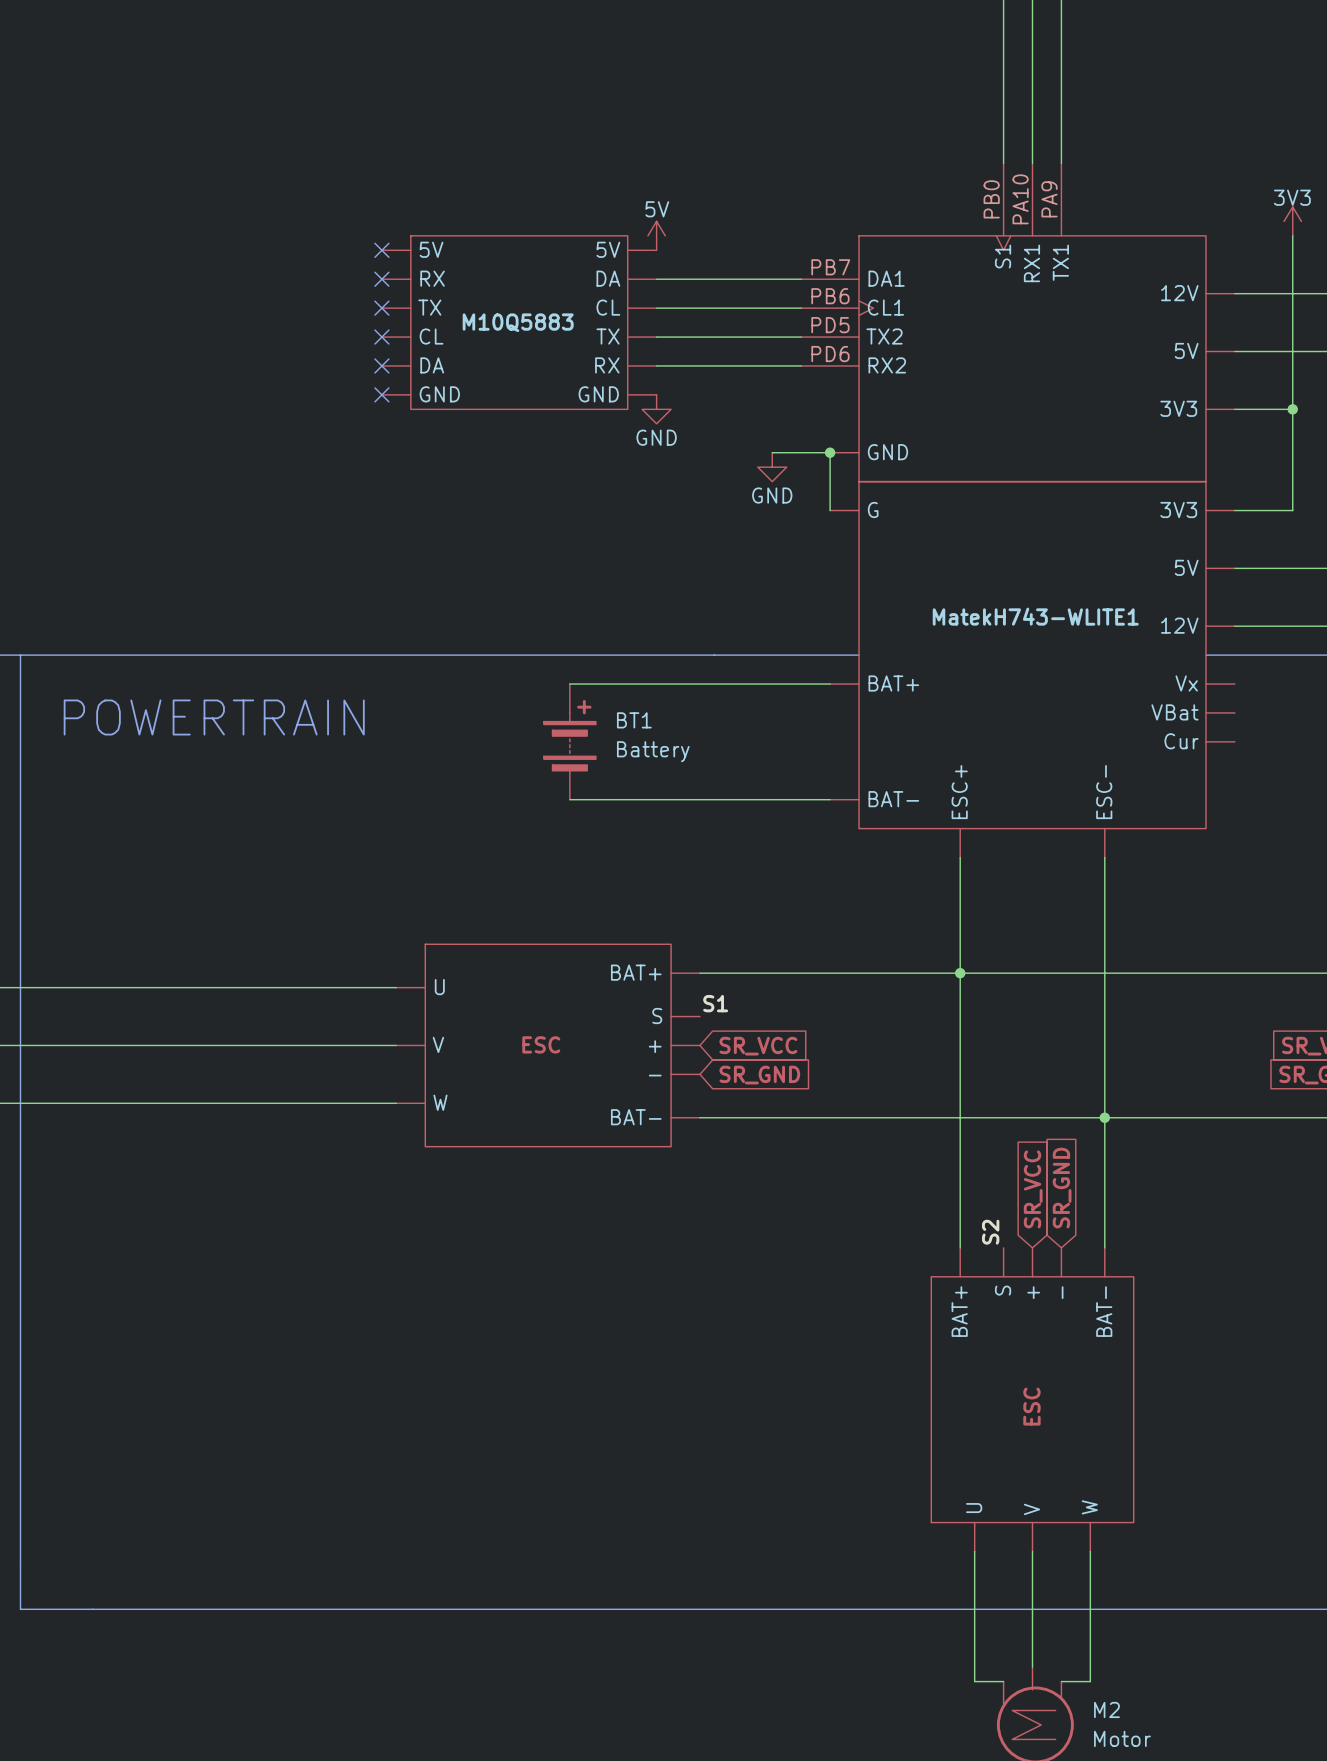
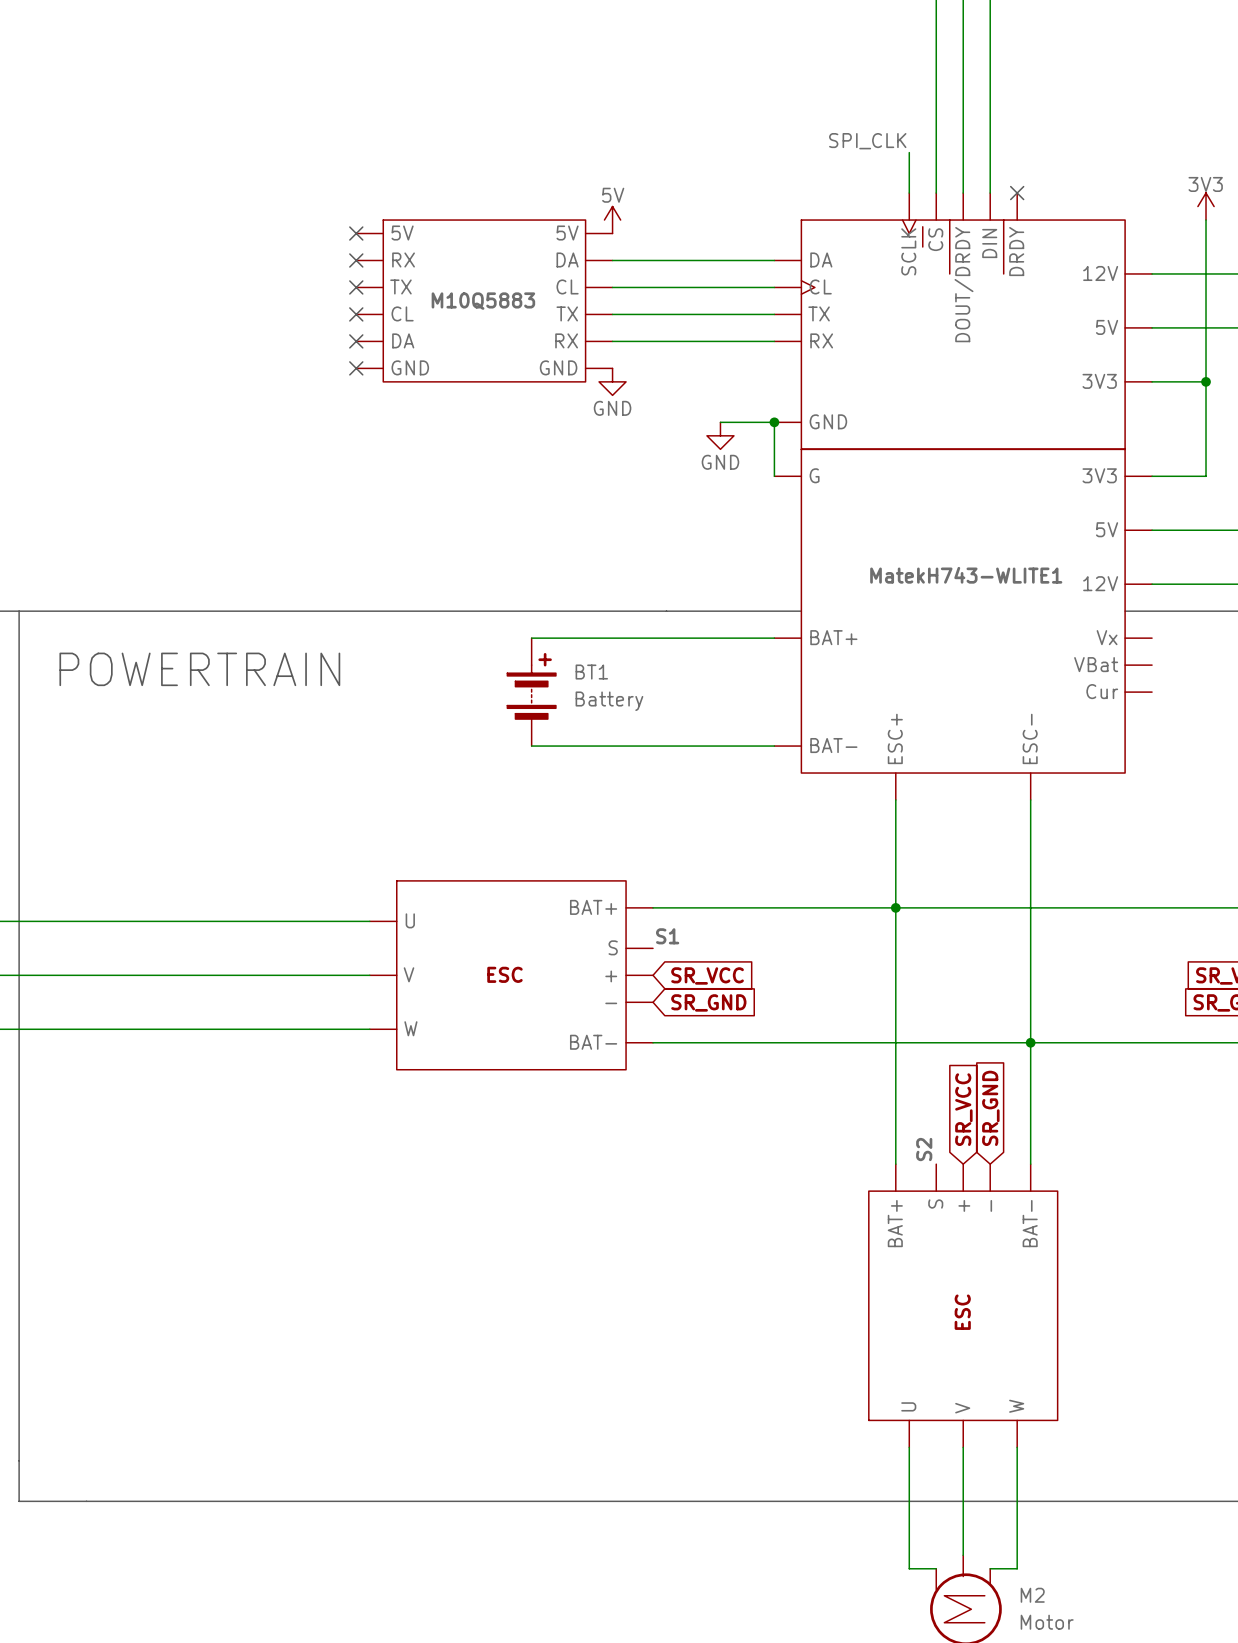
label: none -> SPI_CLK (867, 141)
MatekH743-WLITE1 symbol: [801, 163, 1235, 482] -> [774, 193, 1153, 450]
wire: none -> (909, 152) (909, 193)
no-connect mark: none -> (1017, 193)

